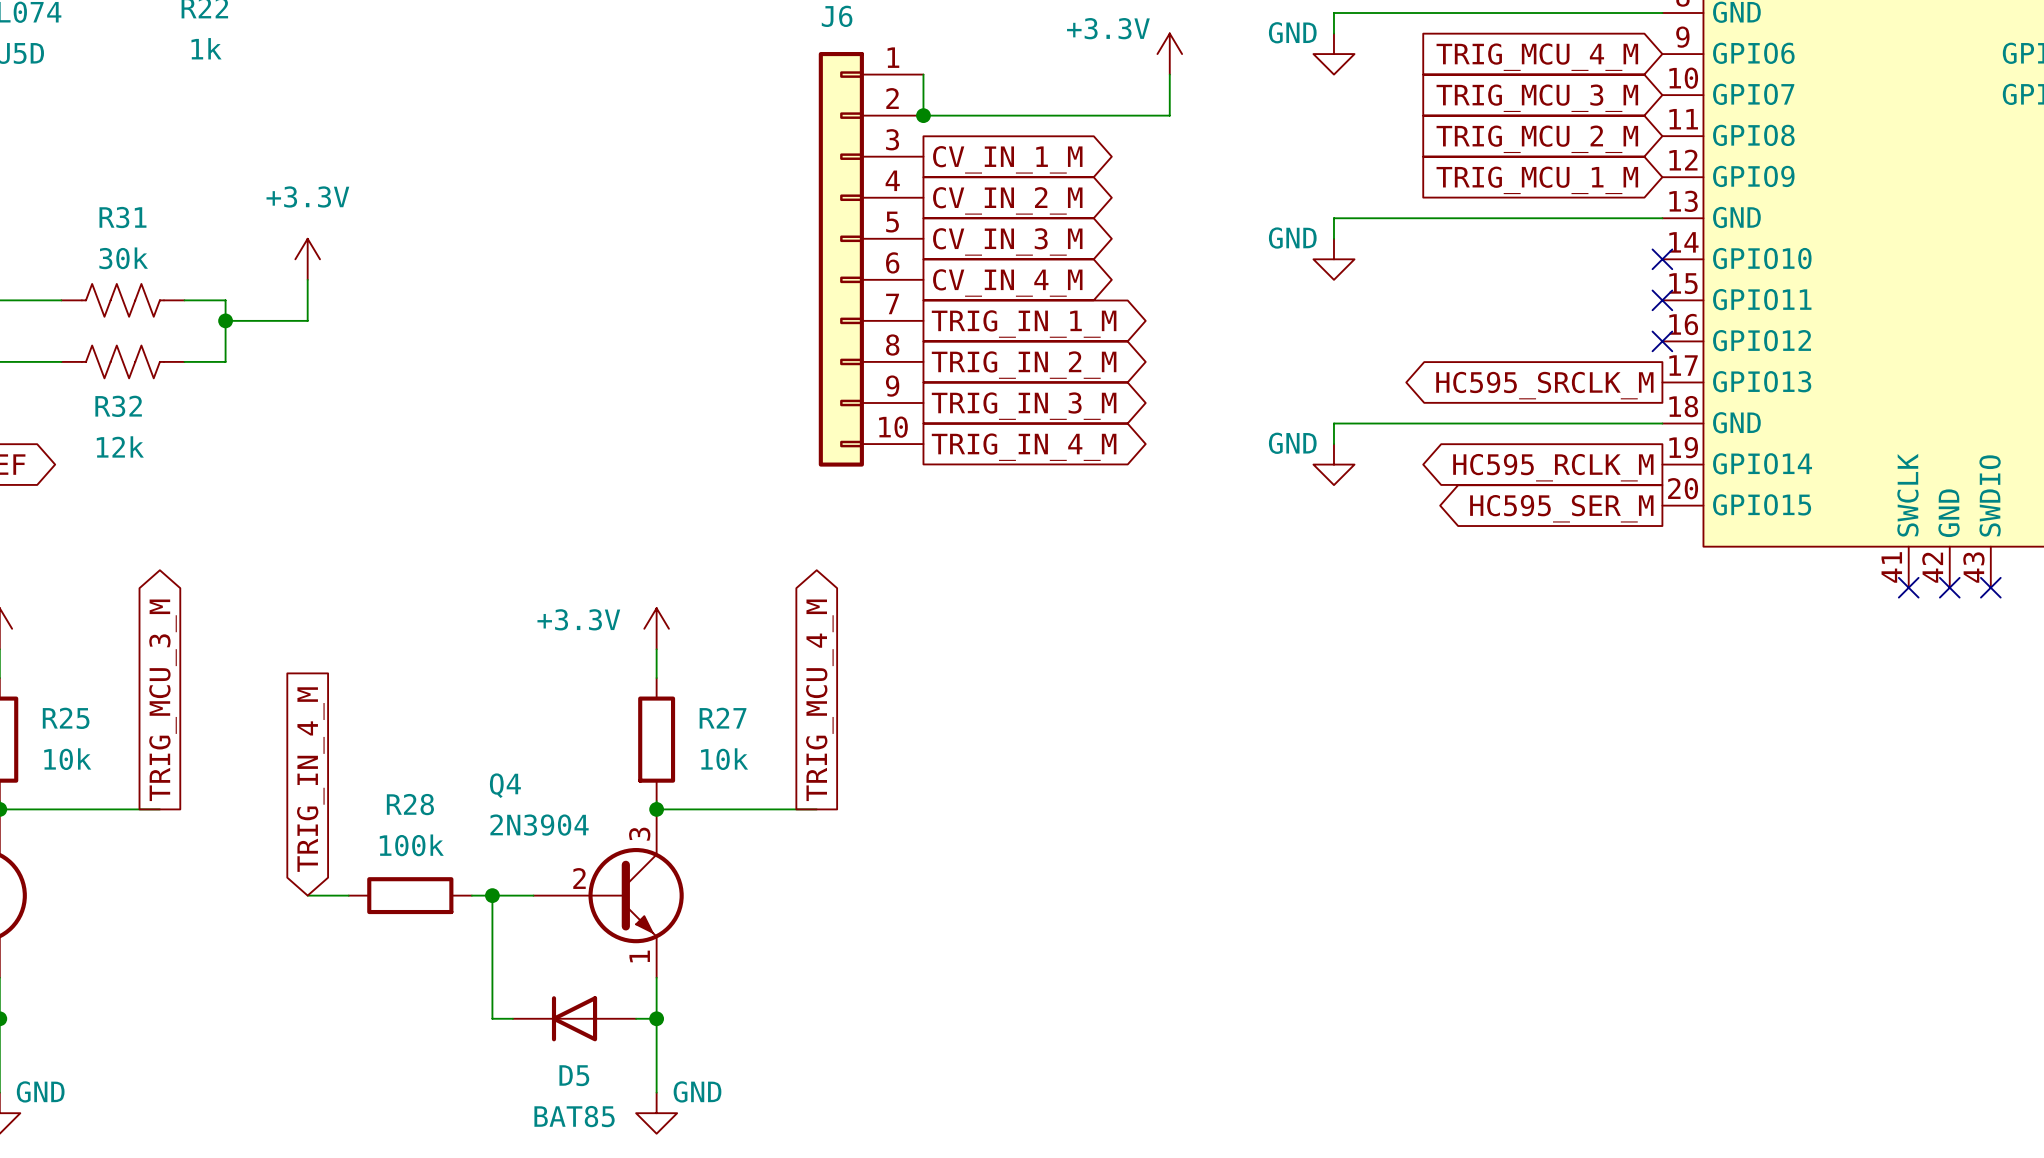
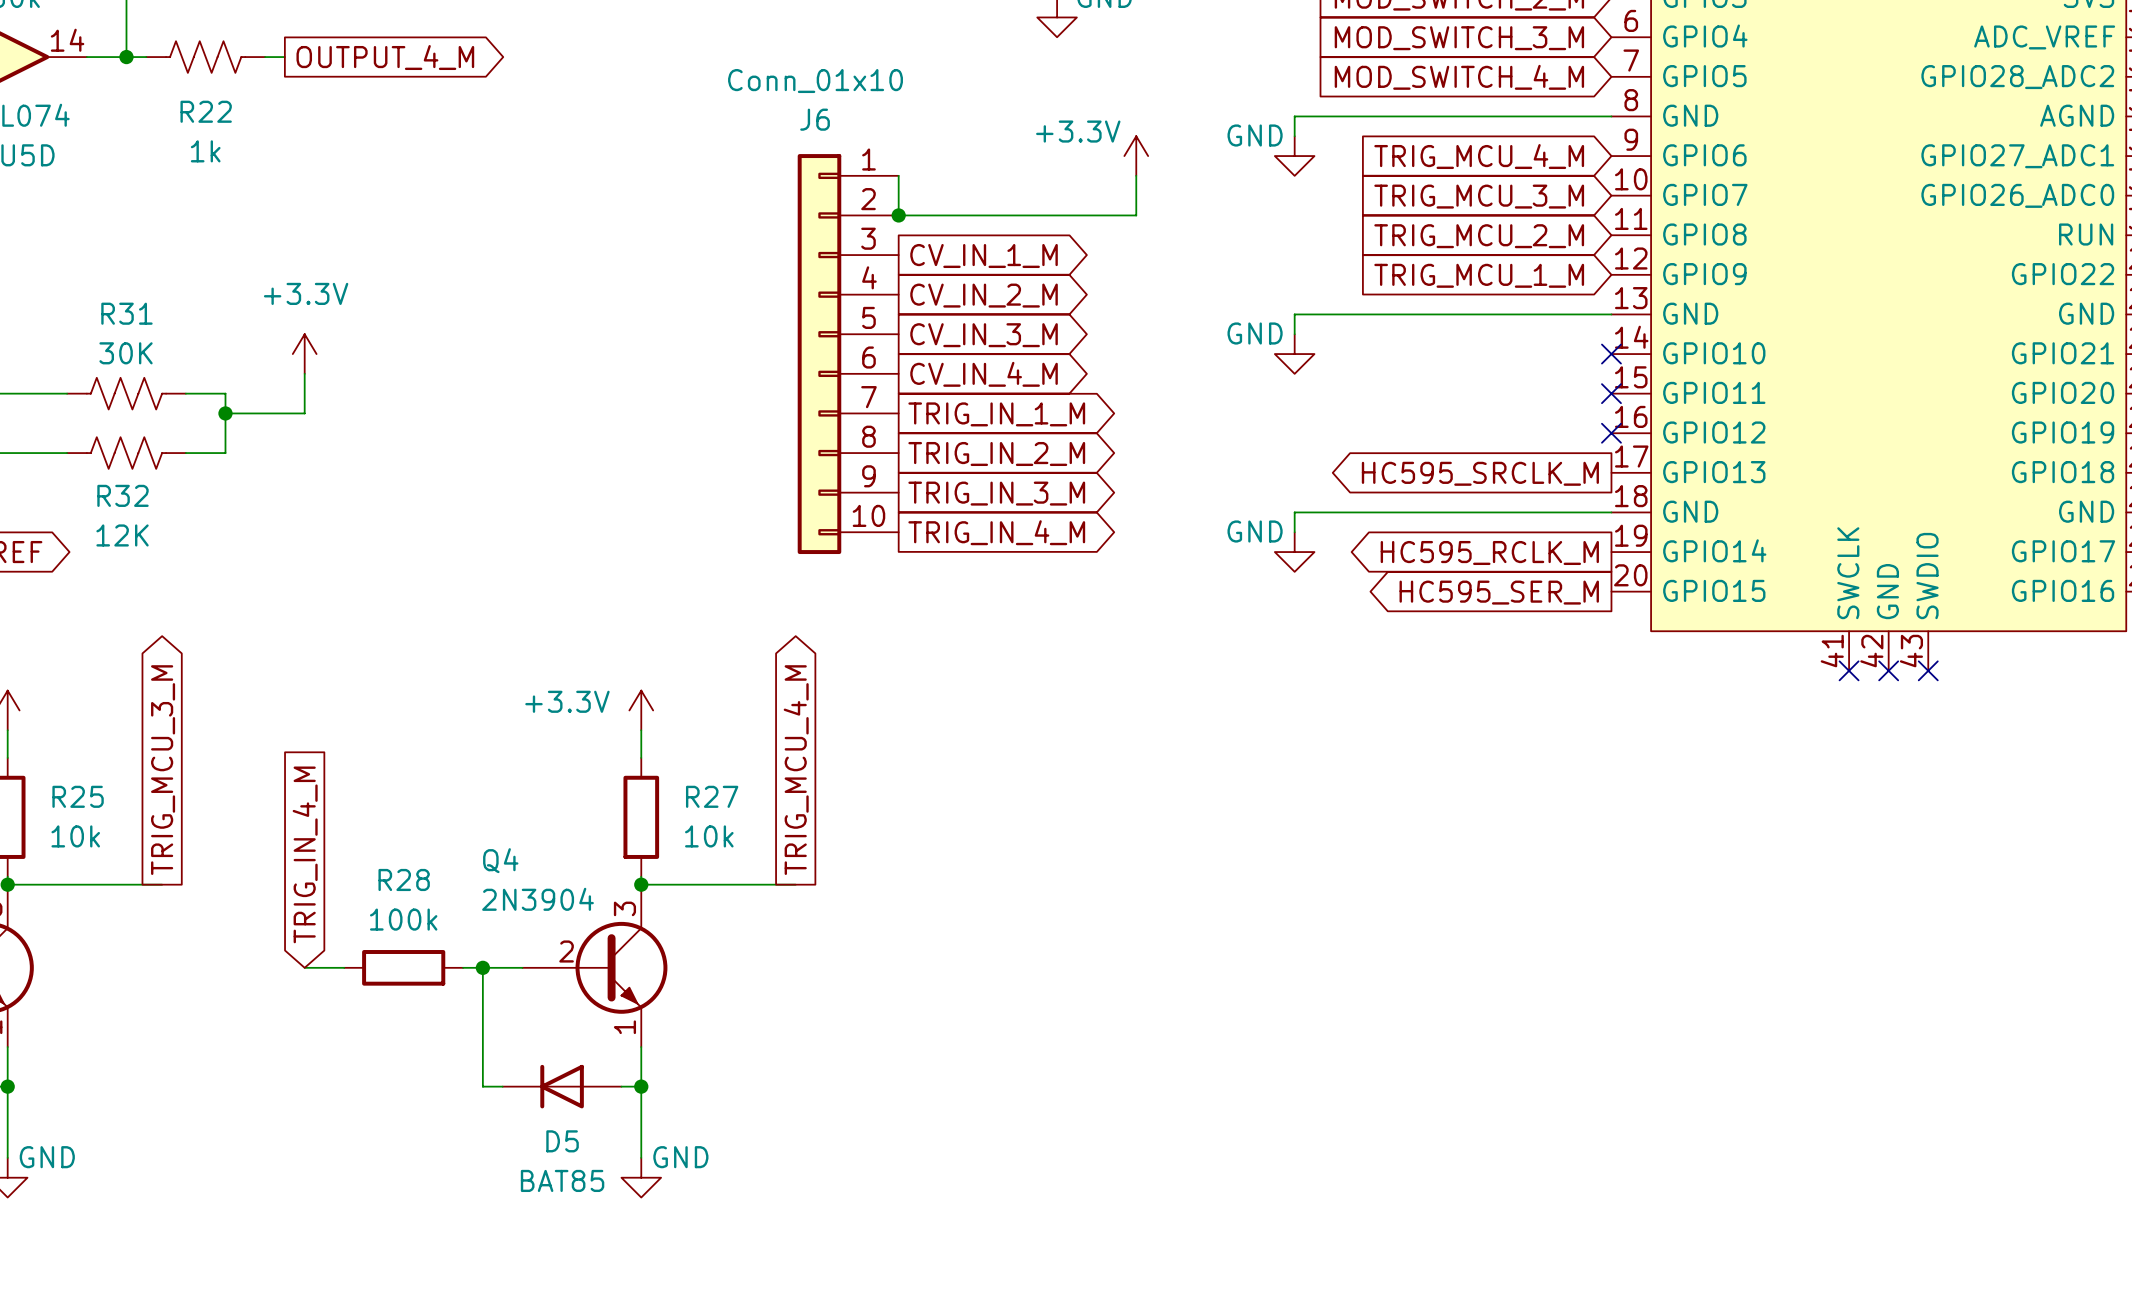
R31 value: 30k (123, 258) -> 30K (126, 353)
R32 value: 12k (120, 446) -> 12K (122, 535)

